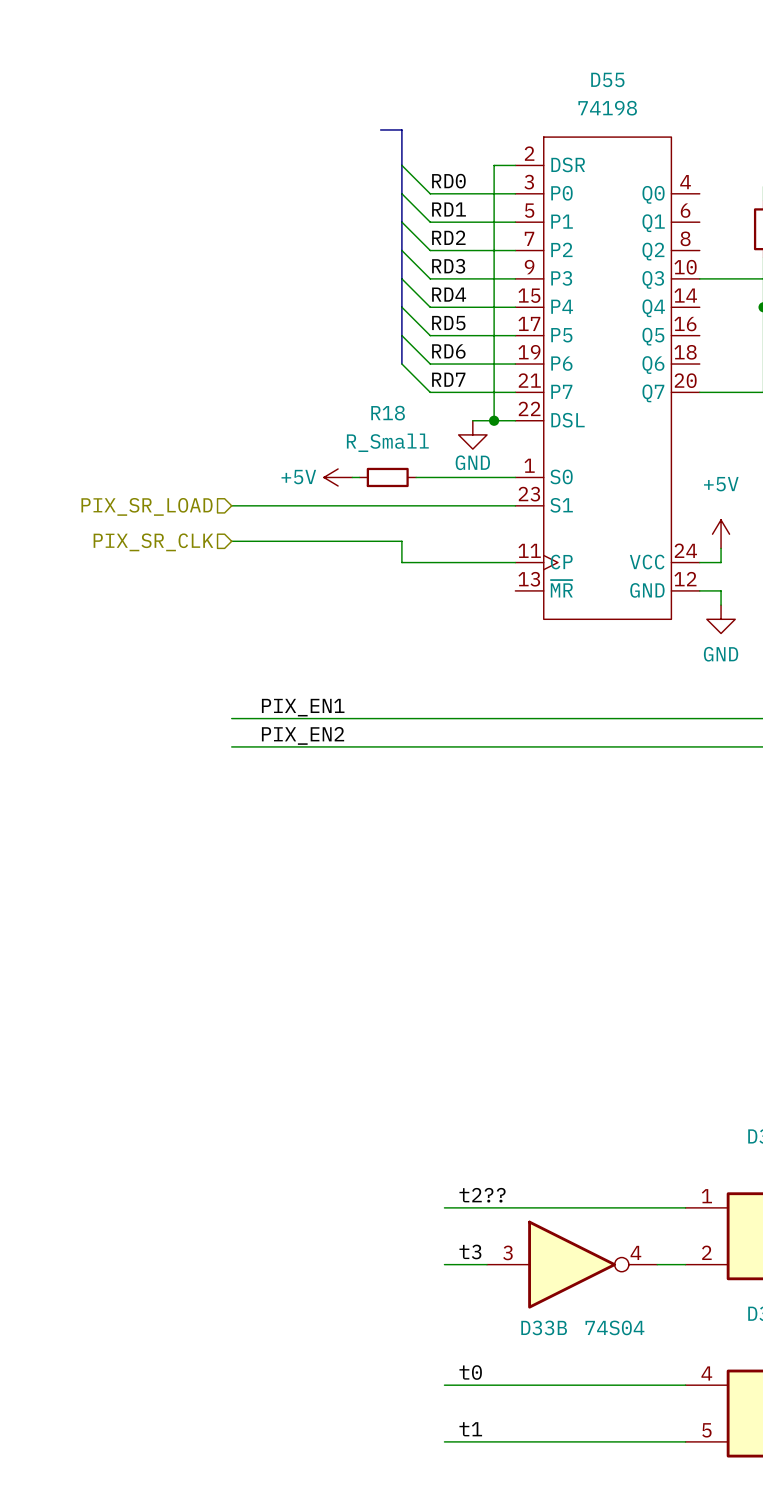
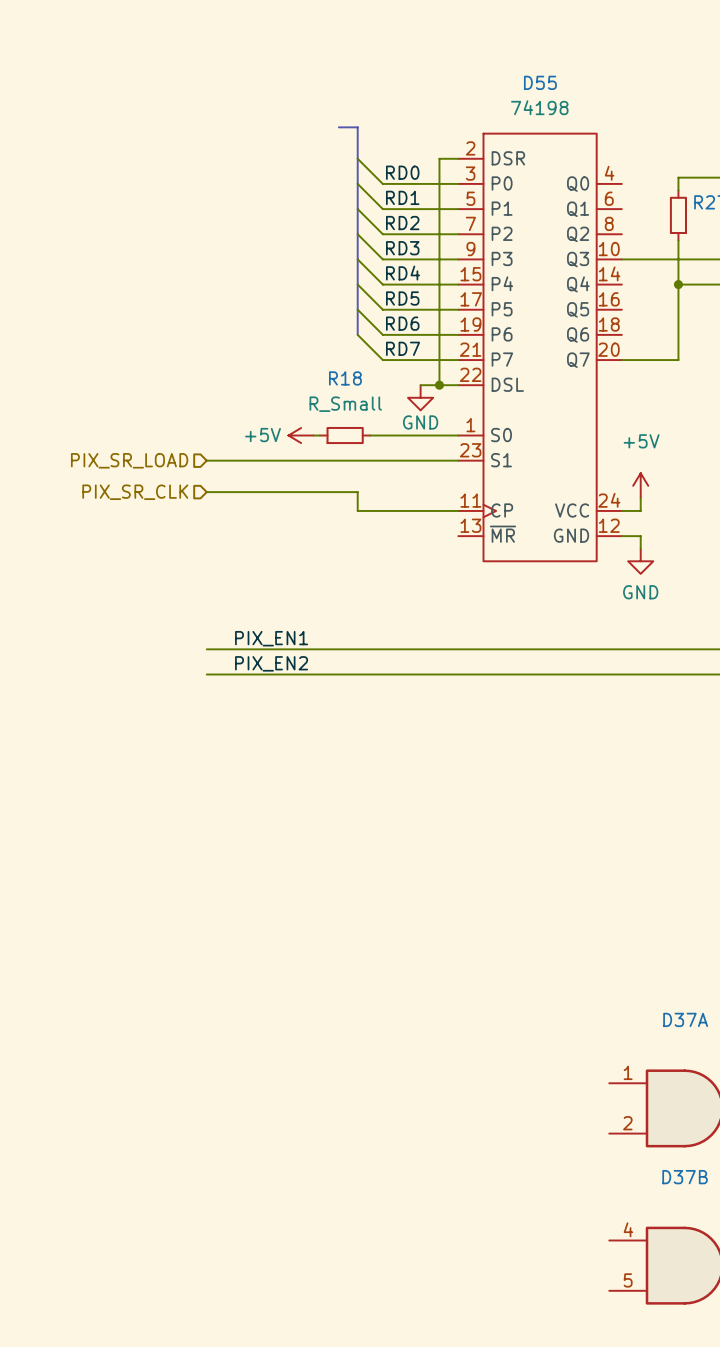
label: t2?? (482, 1195) -> none
wire: (444, 1207) (685, 1207) -> none
label: t3 (470, 1251) -> none
wire: (444, 1264) (487, 1264) -> none
D33B: 74S04 (572, 1264) -> none
wire: (657, 1264) (685, 1264) -> none
label: t0 (470, 1372) -> none
wire: (444, 1385) (685, 1385) -> none
label: t1 (470, 1429) -> none
wire: (444, 1441) (685, 1441) -> none

